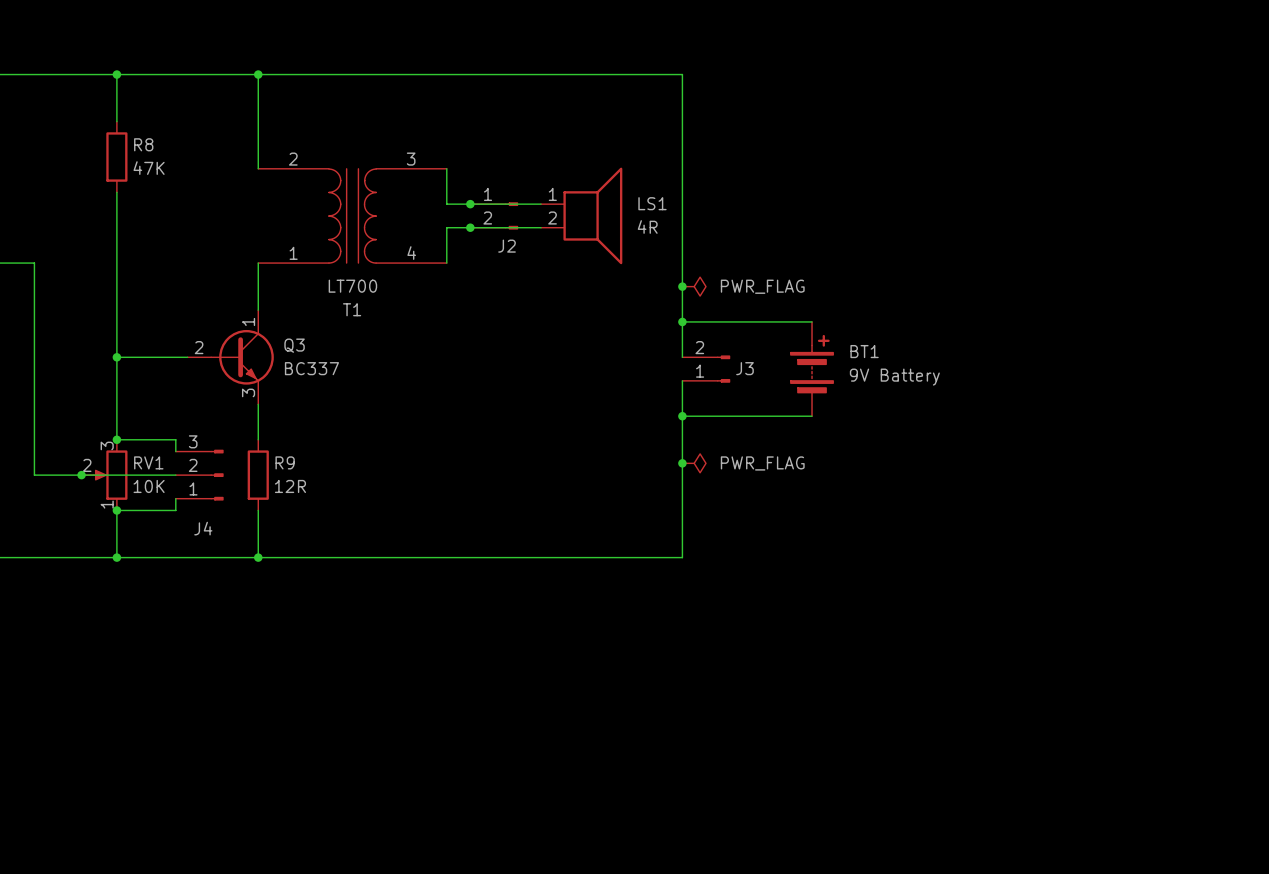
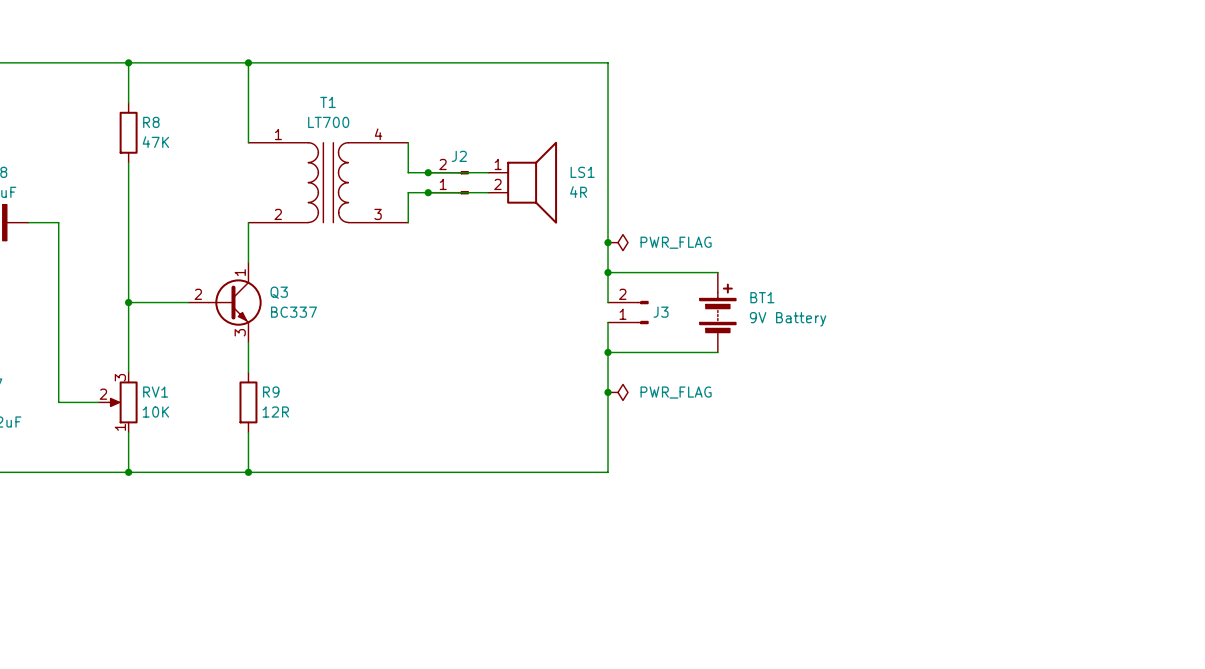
T1 flip: as is (352, 215) -> up-down (328, 182)
J2 flip: as is (511, 215) -> up-down (463, 182)
wire: (116, 439) (175, 439) (175, 451) -> none
junction: (116, 439) -> none
wire: (81, 475) (175, 475) -> none
junction: (81, 475) -> none
J4: (199, 475) -> none
wire: (175, 498) (175, 510) (116, 510) -> none
junction: (116, 510) -> none

